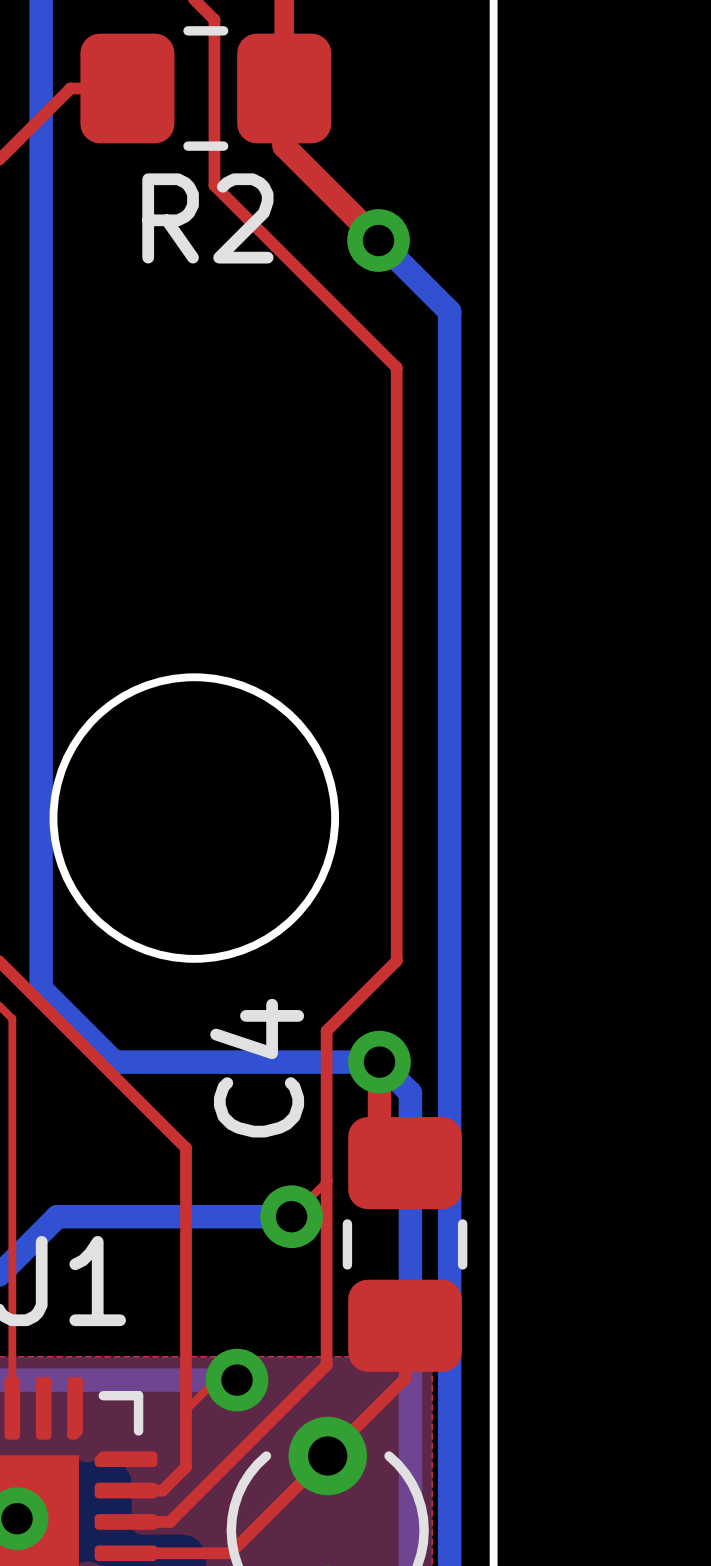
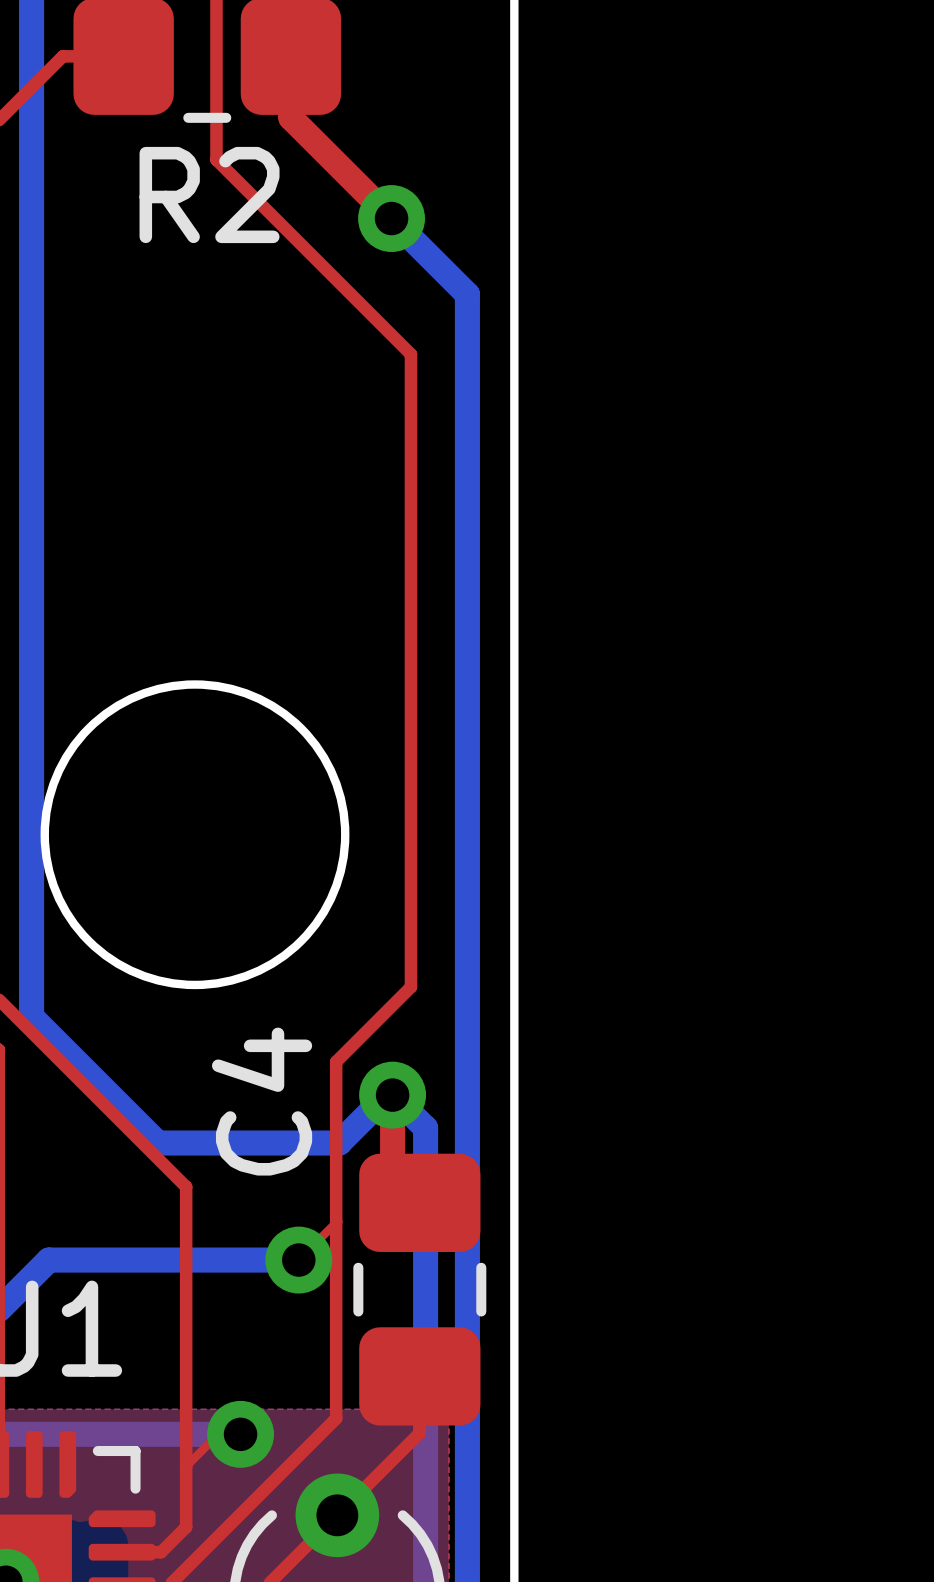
bottom track: (114, 1062) (374, 1062) -> (109, 1095) (157, 1143) (339, 1143) (387, 1095)

